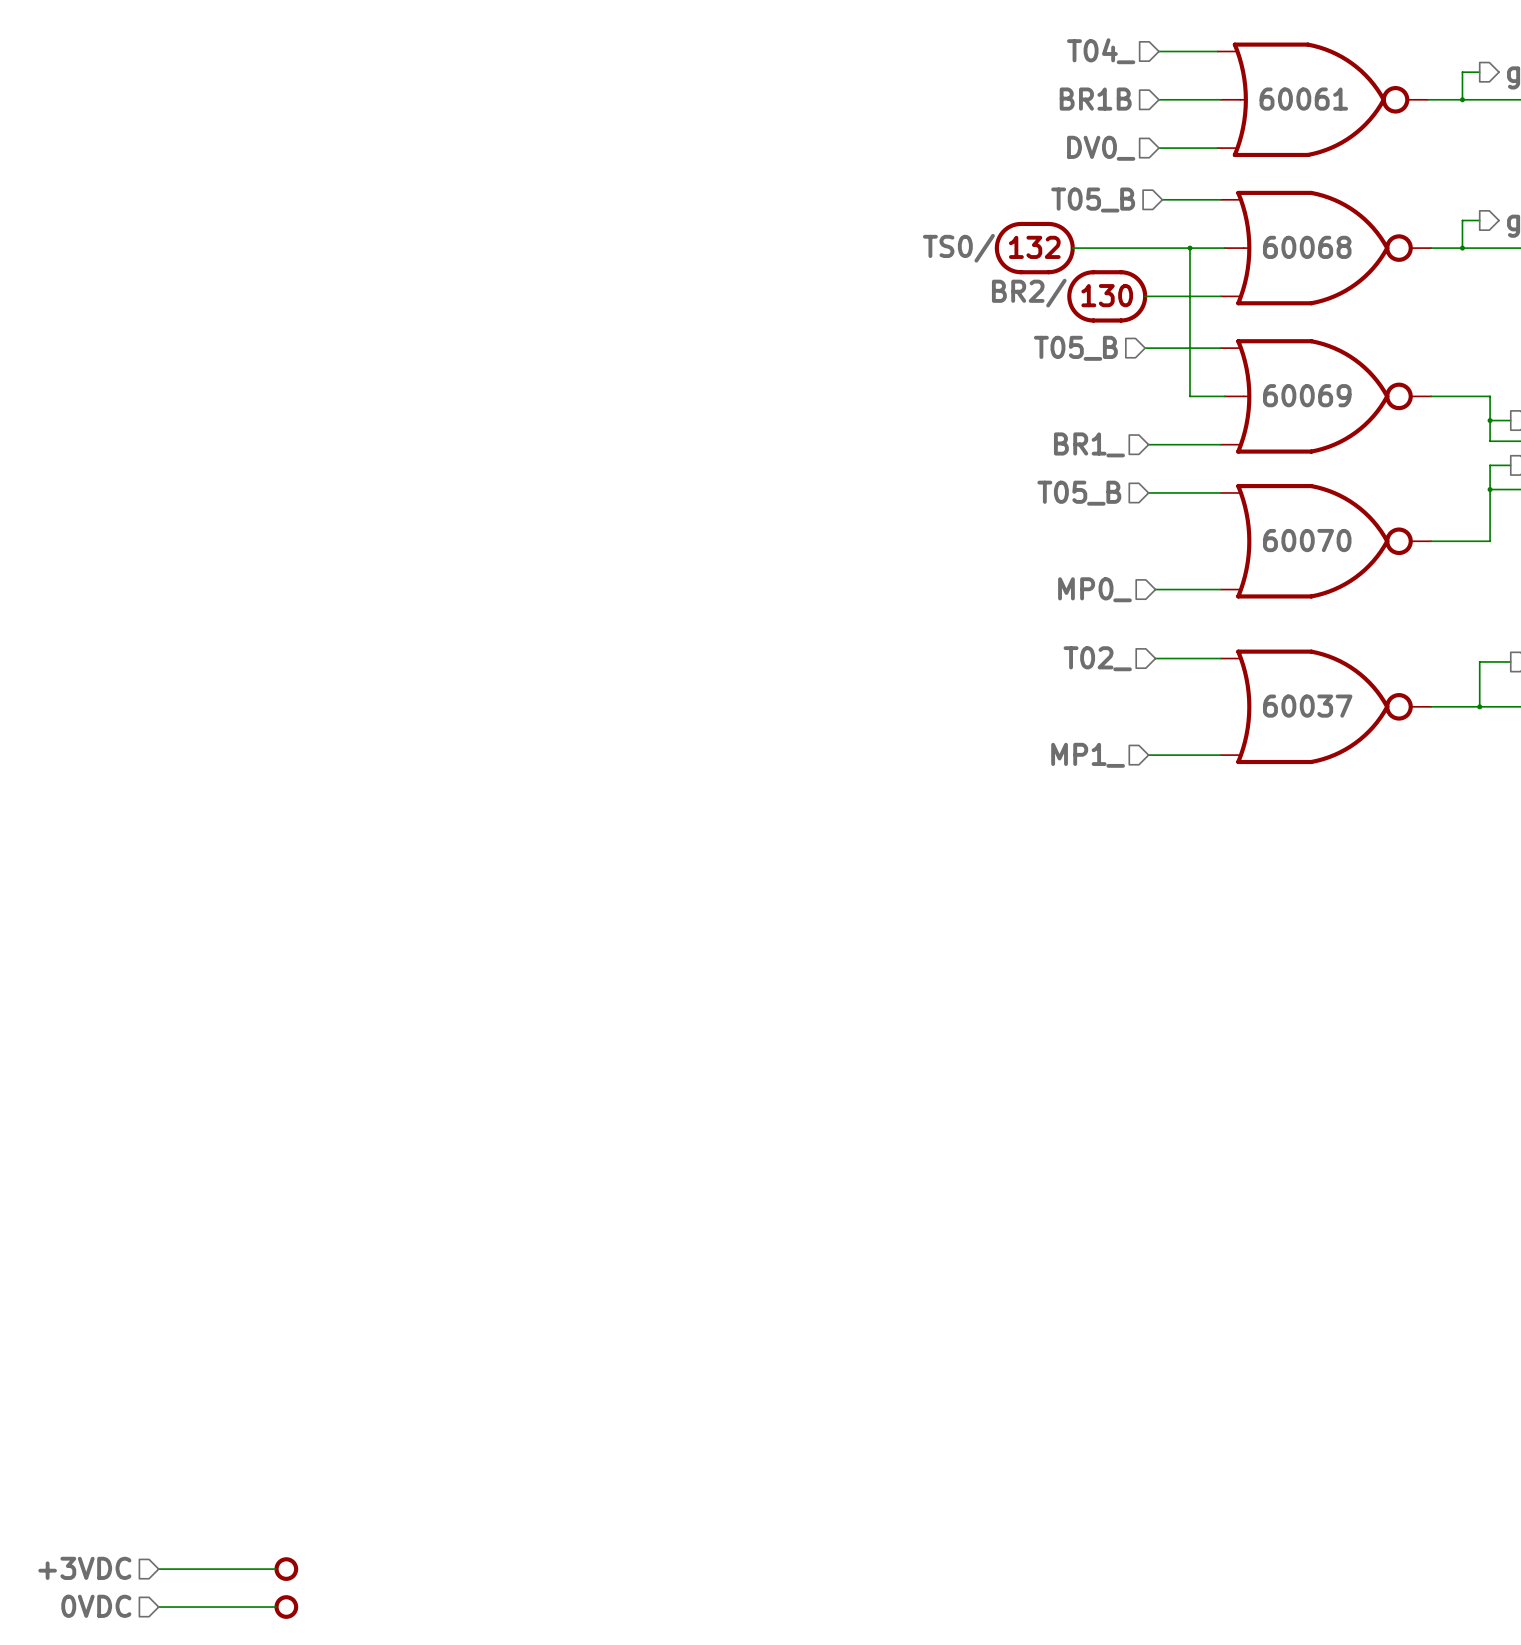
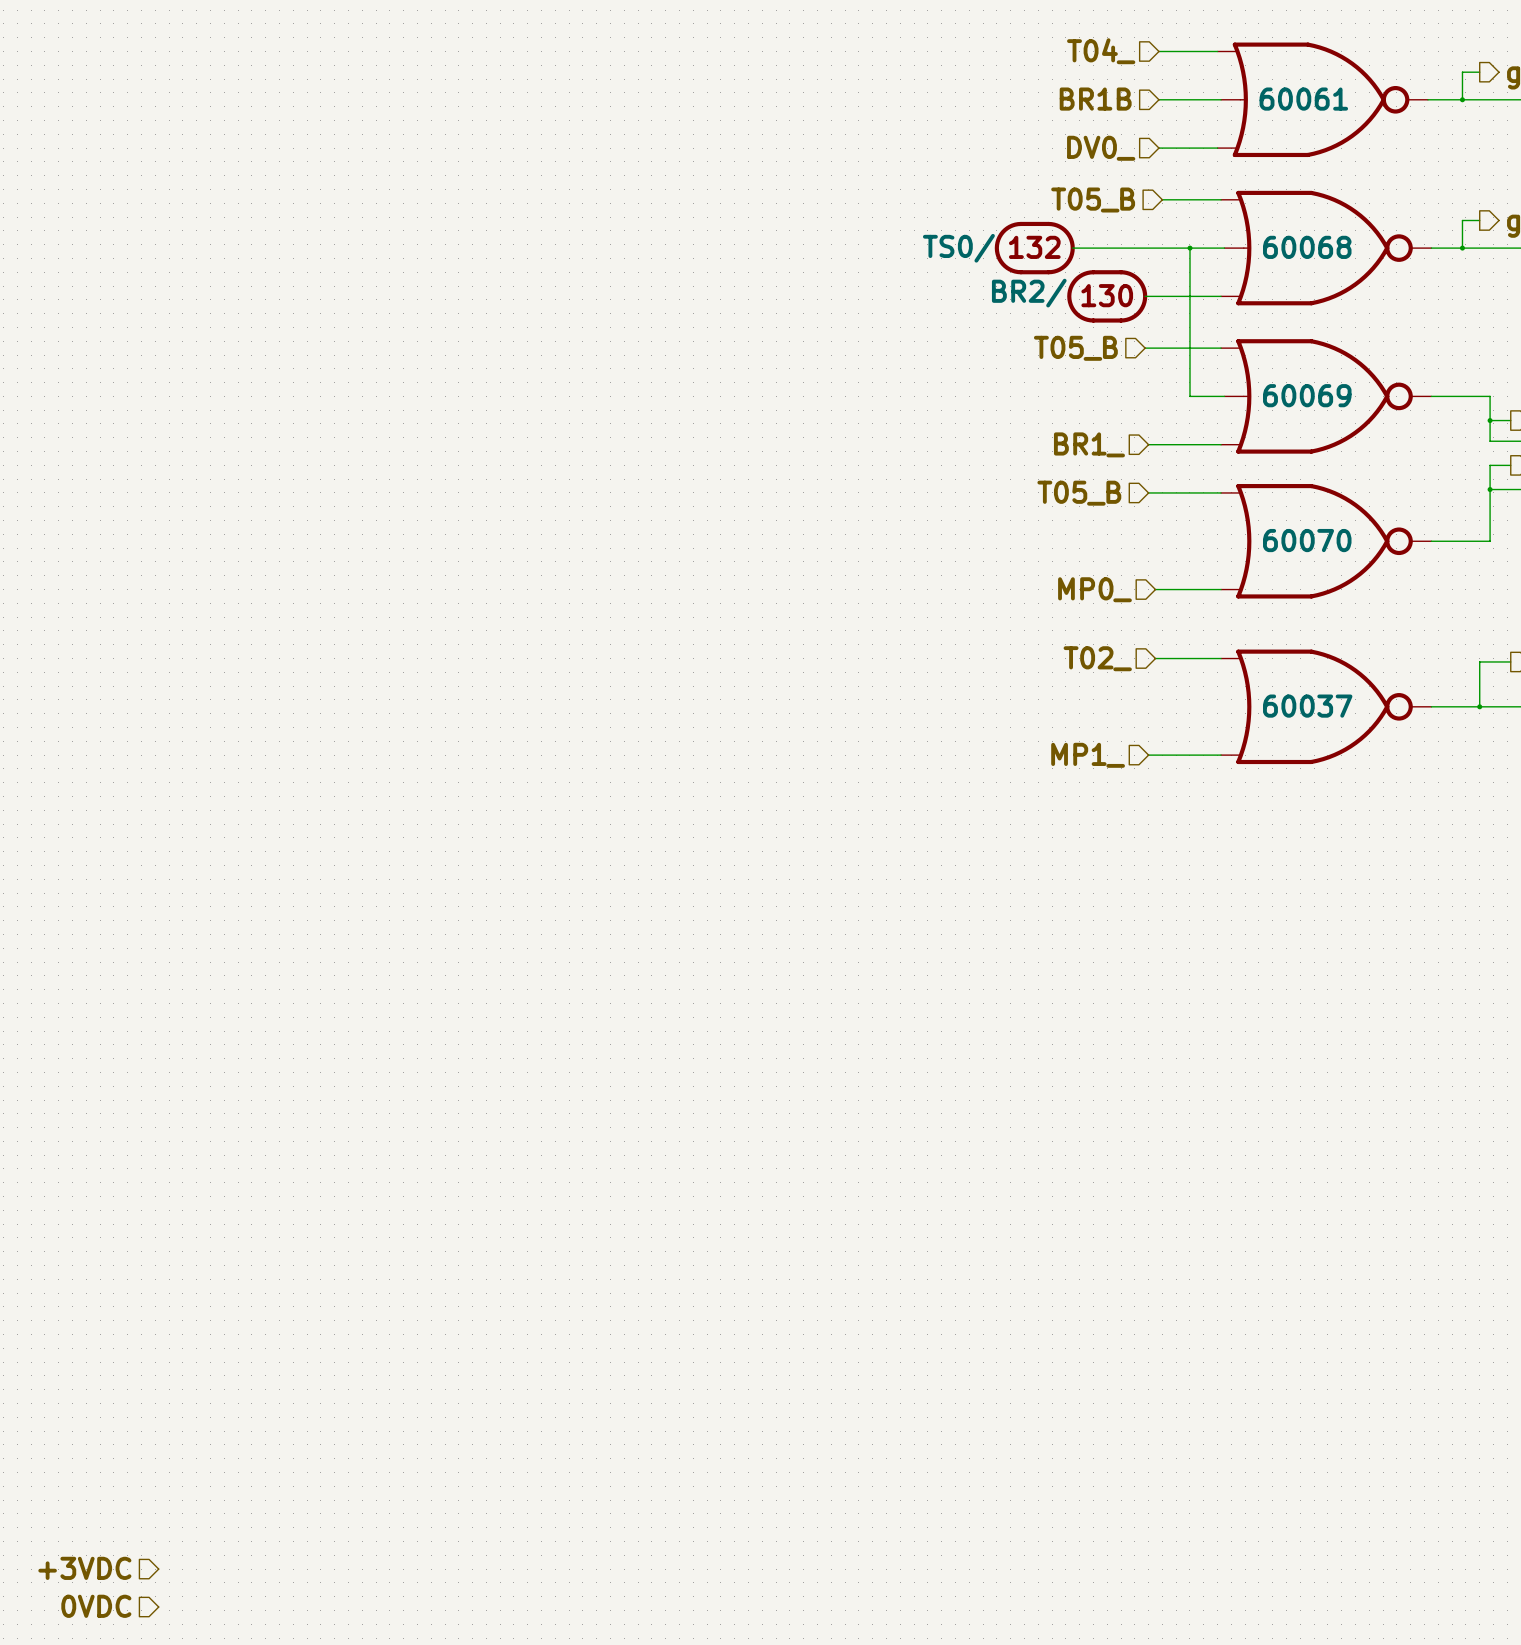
wire: (158, 1569) (275, 1569) -> none
part: (286, 1569) -> none
wire: (158, 1607) (275, 1607) -> none
part: (286, 1607) -> none

